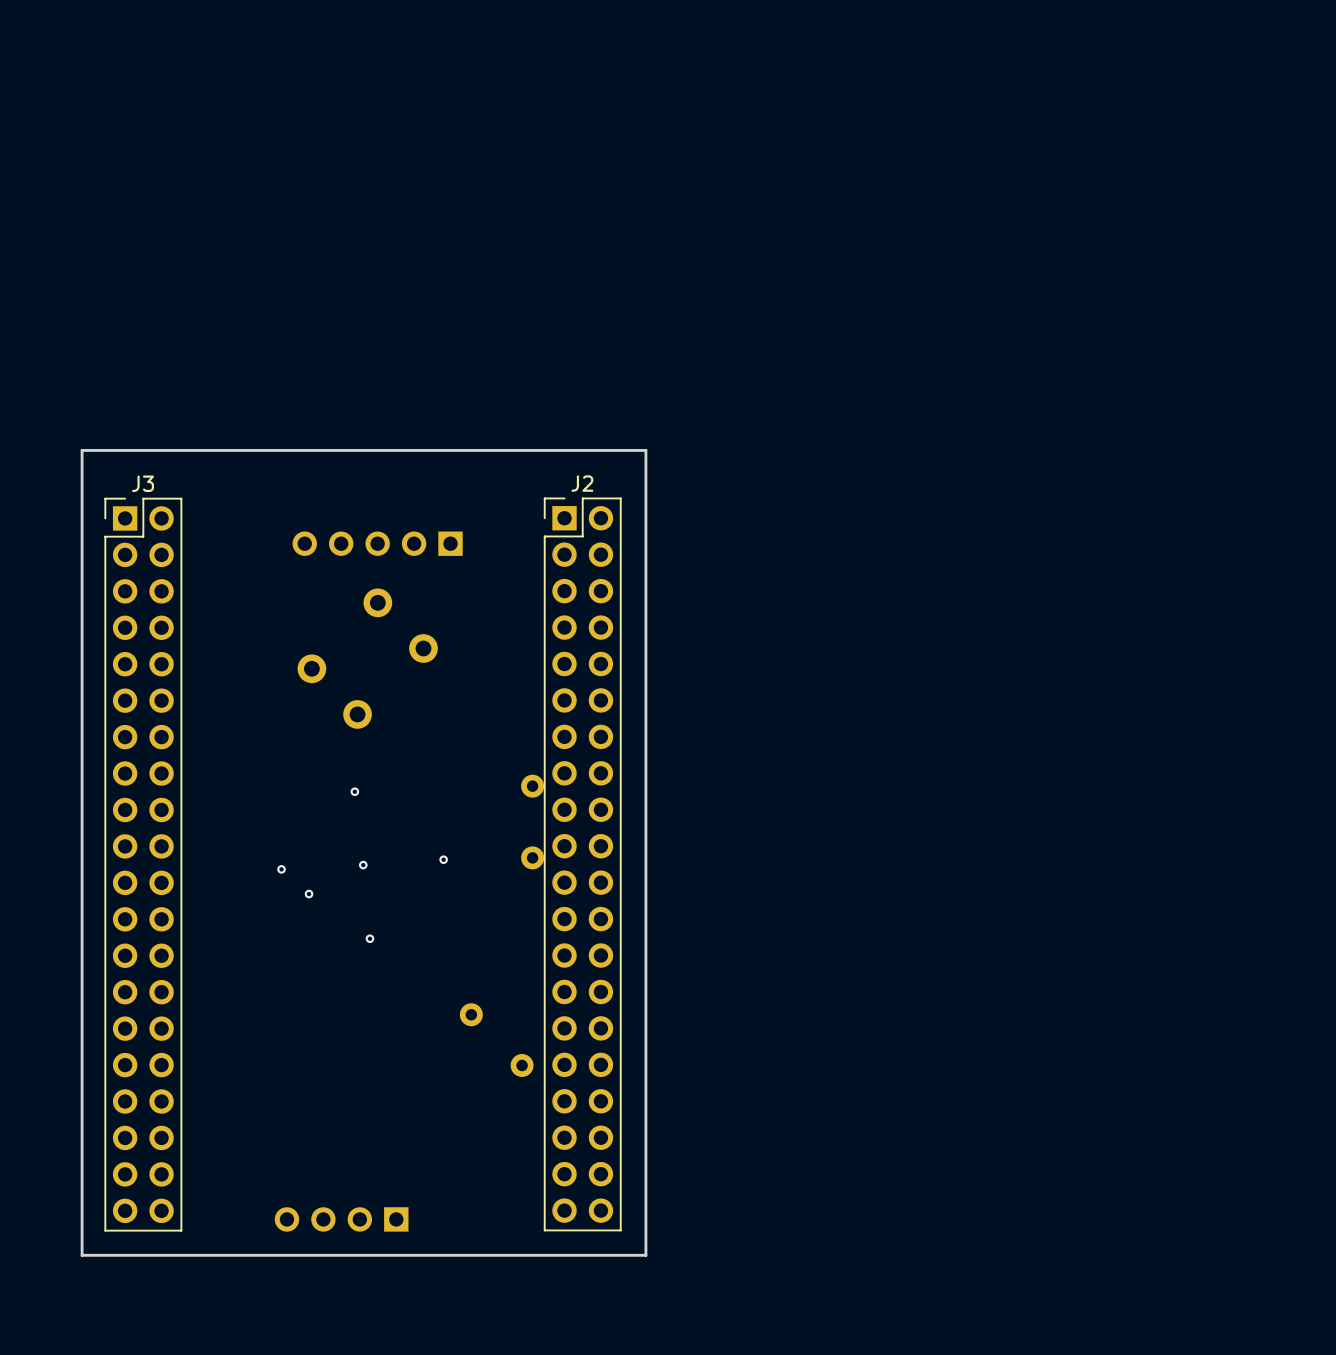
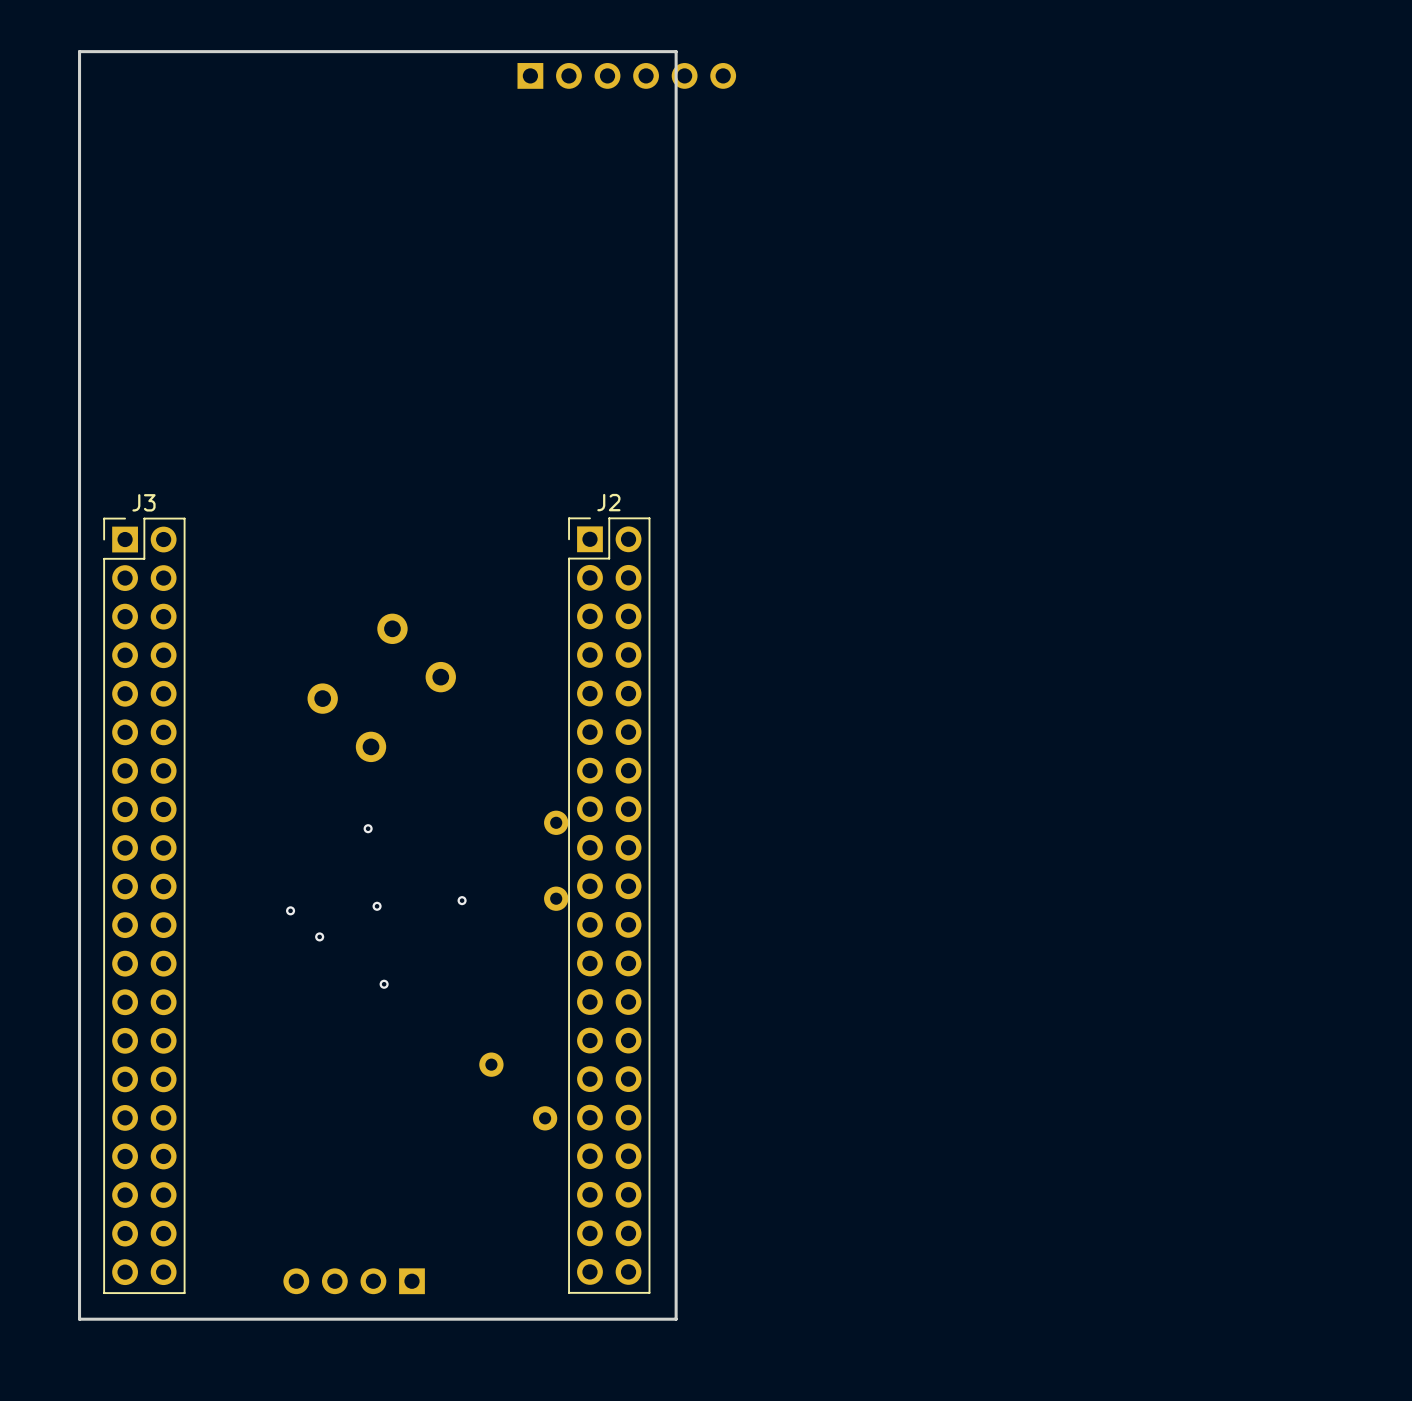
part: none -> (626, 75)
board edge: (645, 450) (82, 450) -> (676, 467) (676, 51) (79, 51) (79, 467)
part: (377, 543) -> none

